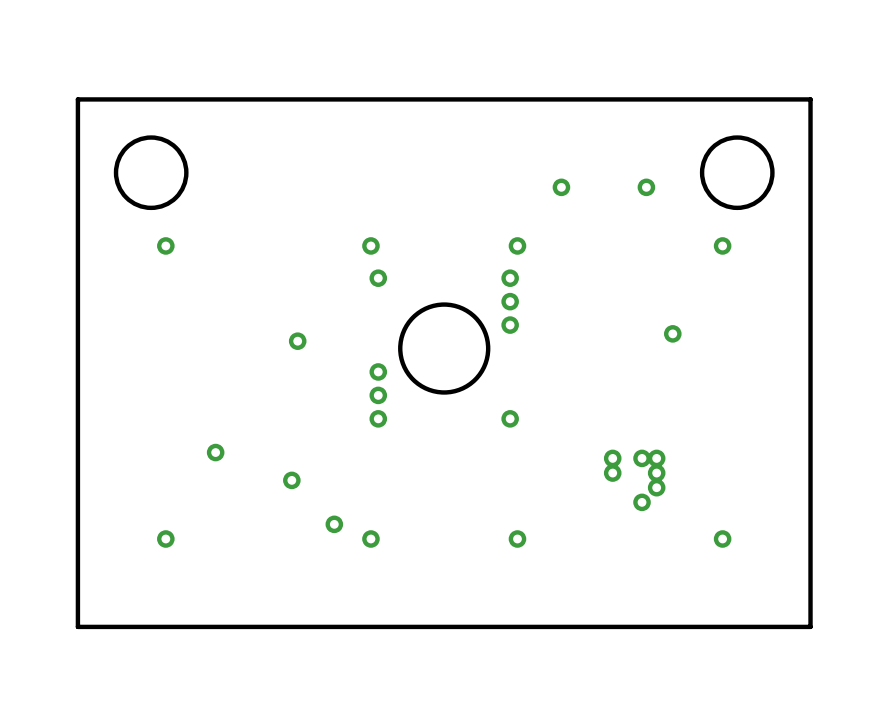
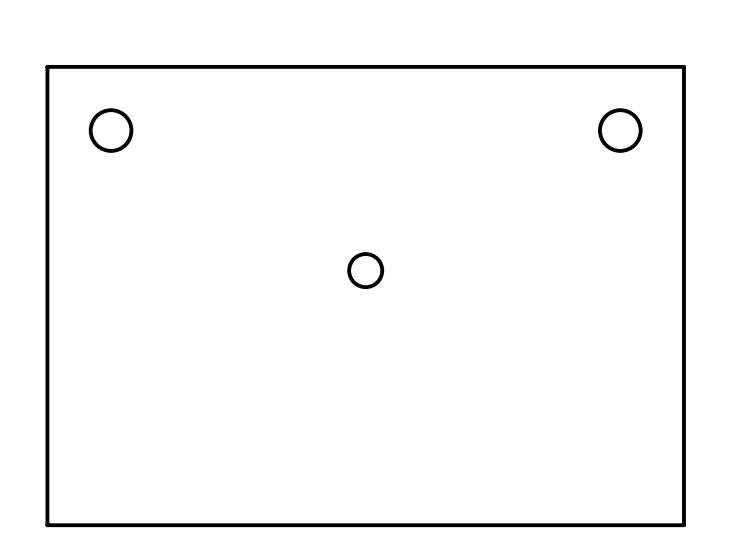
round board edge size: [113, 135, 189, 211] -> [88, 108, 134, 153]
round board edge size: [699, 135, 775, 211] -> [598, 108, 643, 153]
via: (561, 187) -> none
via: (646, 187) -> none
via: (165, 245) -> none
via: (370, 245) -> none
via: (517, 245) -> none
via: (722, 245) -> none
via: (378, 278) -> none
via: (510, 278) -> none
via: (510, 301) -> none
round board edge size: [398, 302, 491, 395] -> [347, 252, 385, 290]
via: (510, 325) -> none
via: (672, 333) -> none
via: (297, 341) -> none
via: (378, 371) -> none
via: (378, 395) -> none
via: (378, 418) -> none
via: (510, 418) -> none
via: (215, 452) -> none
via: (612, 458) -> none
via: (642, 458) -> none
via: (656, 458) -> none
via: (612, 473) -> none
via: (656, 473) -> none
via: (291, 480) -> none
via: (656, 487) -> none
via: (642, 502) -> none
via: (334, 524) -> none
via: (165, 538) -> none
via: (370, 538) -> none
via: (517, 538) -> none
via: (722, 538) -> none

